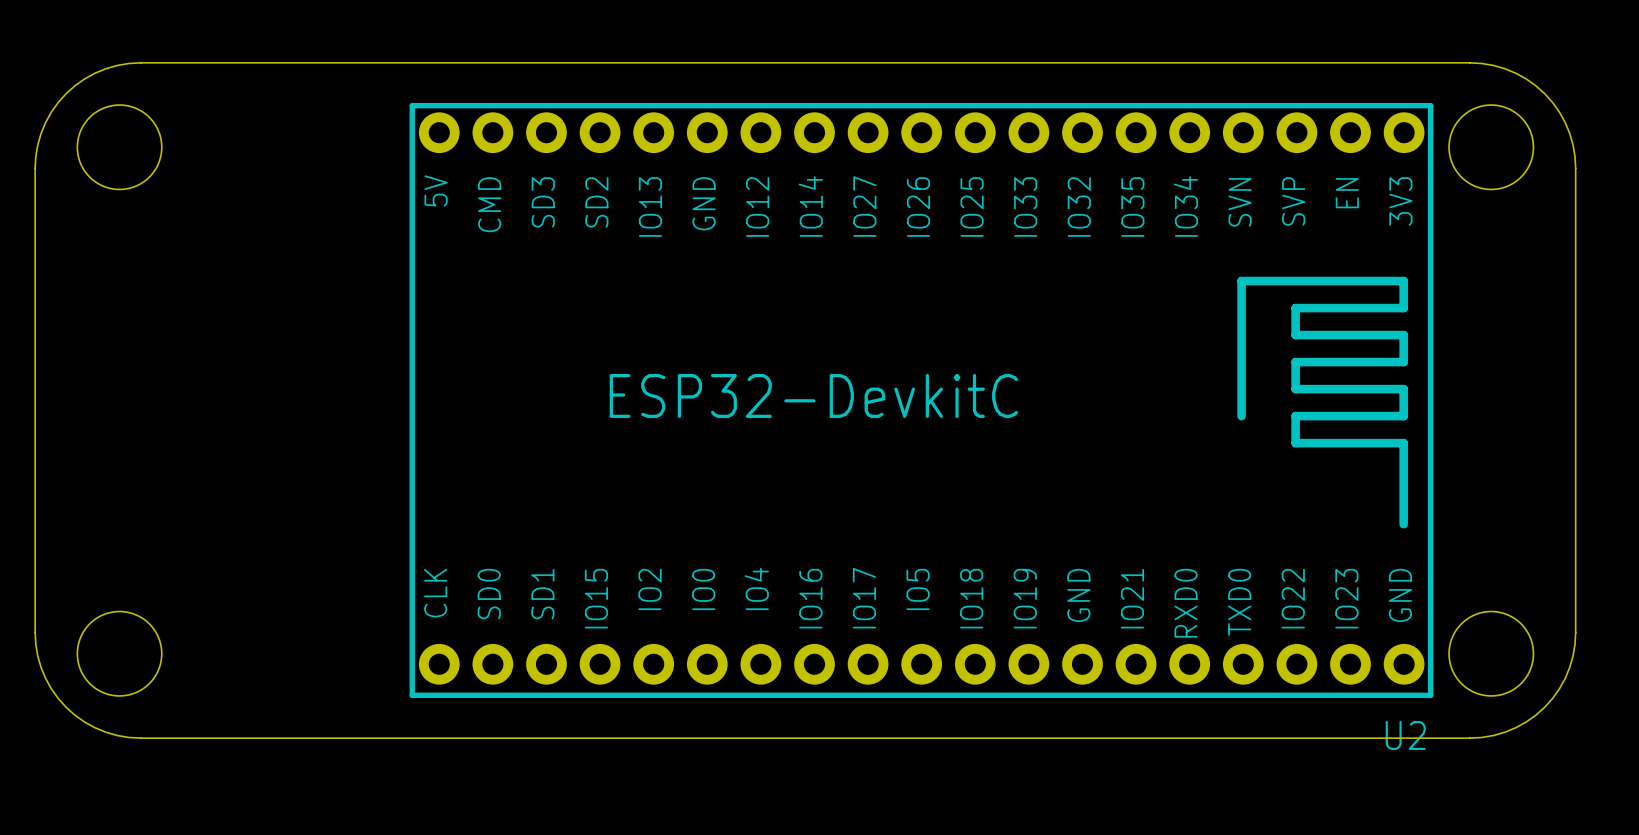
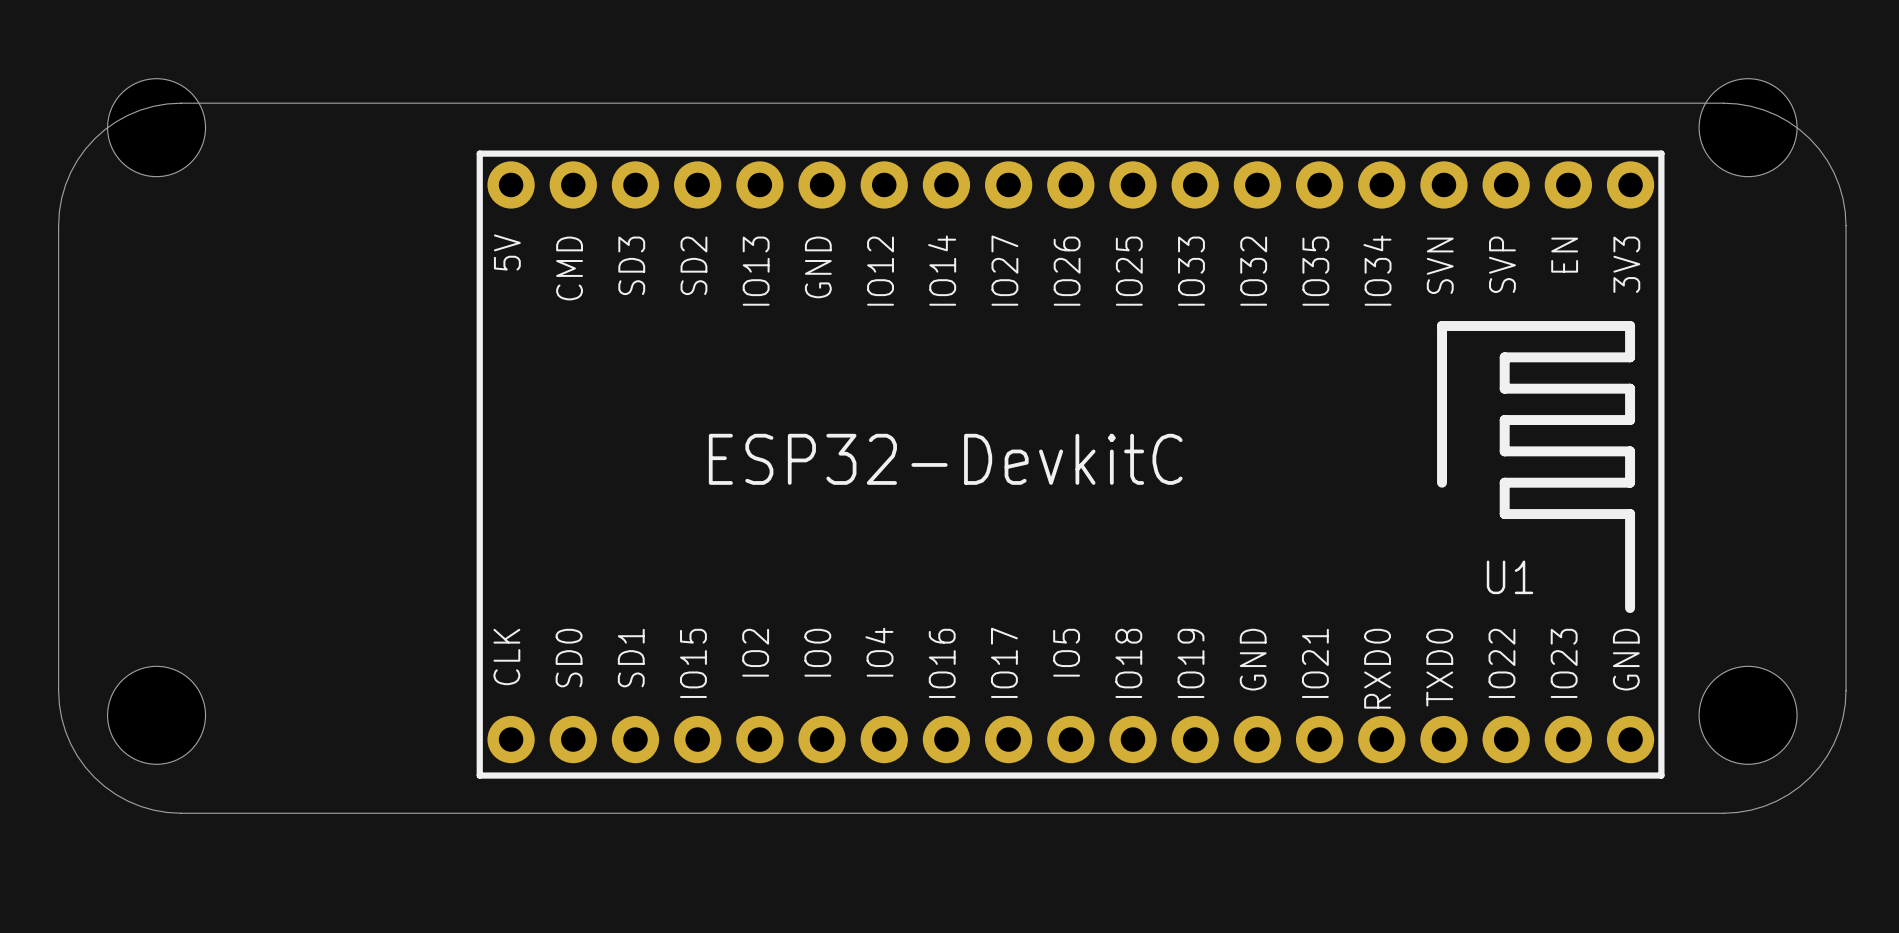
board edge: (1575, 231) (1575, 156) (1569, 133) (1559, 112) (1544, 93) (1526, 79) (1505, 68) (1470, 62) (128, 63) (105, 68) (84, 79) (66, 93) (51, 112) (41, 133) (35, 156) (35, 231) -> (1846, 225) (1845, 211) (1839, 185) (1827, 160) (1810, 139) (1788, 121) (1764, 110) (1737, 103) (1723, 103) (167, 103) (140, 110) (115, 121) (104, 129) (85, 149) (77, 160) (65, 185) (59, 211) (58, 225)
U2: (921, 400) -> none
U1: none -> (1070, 464)

